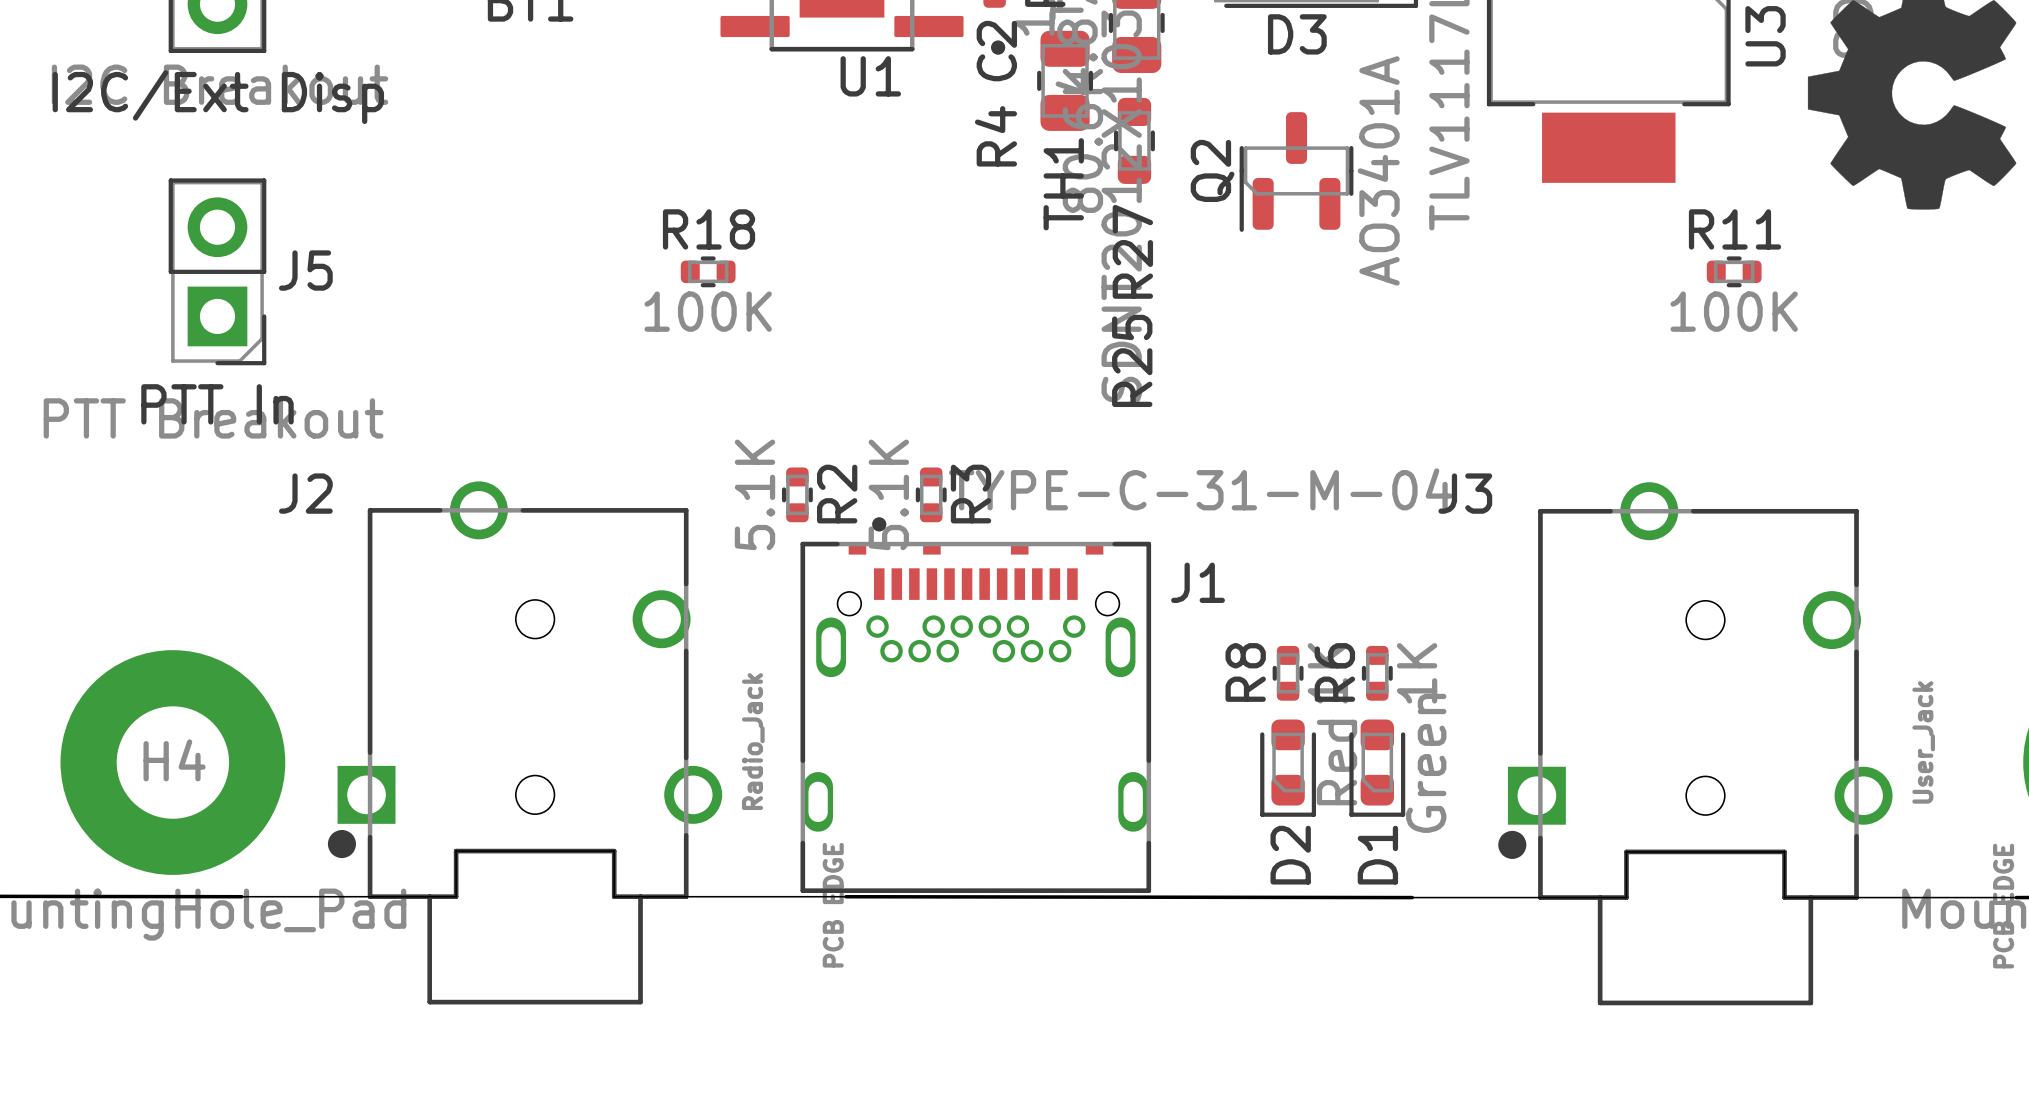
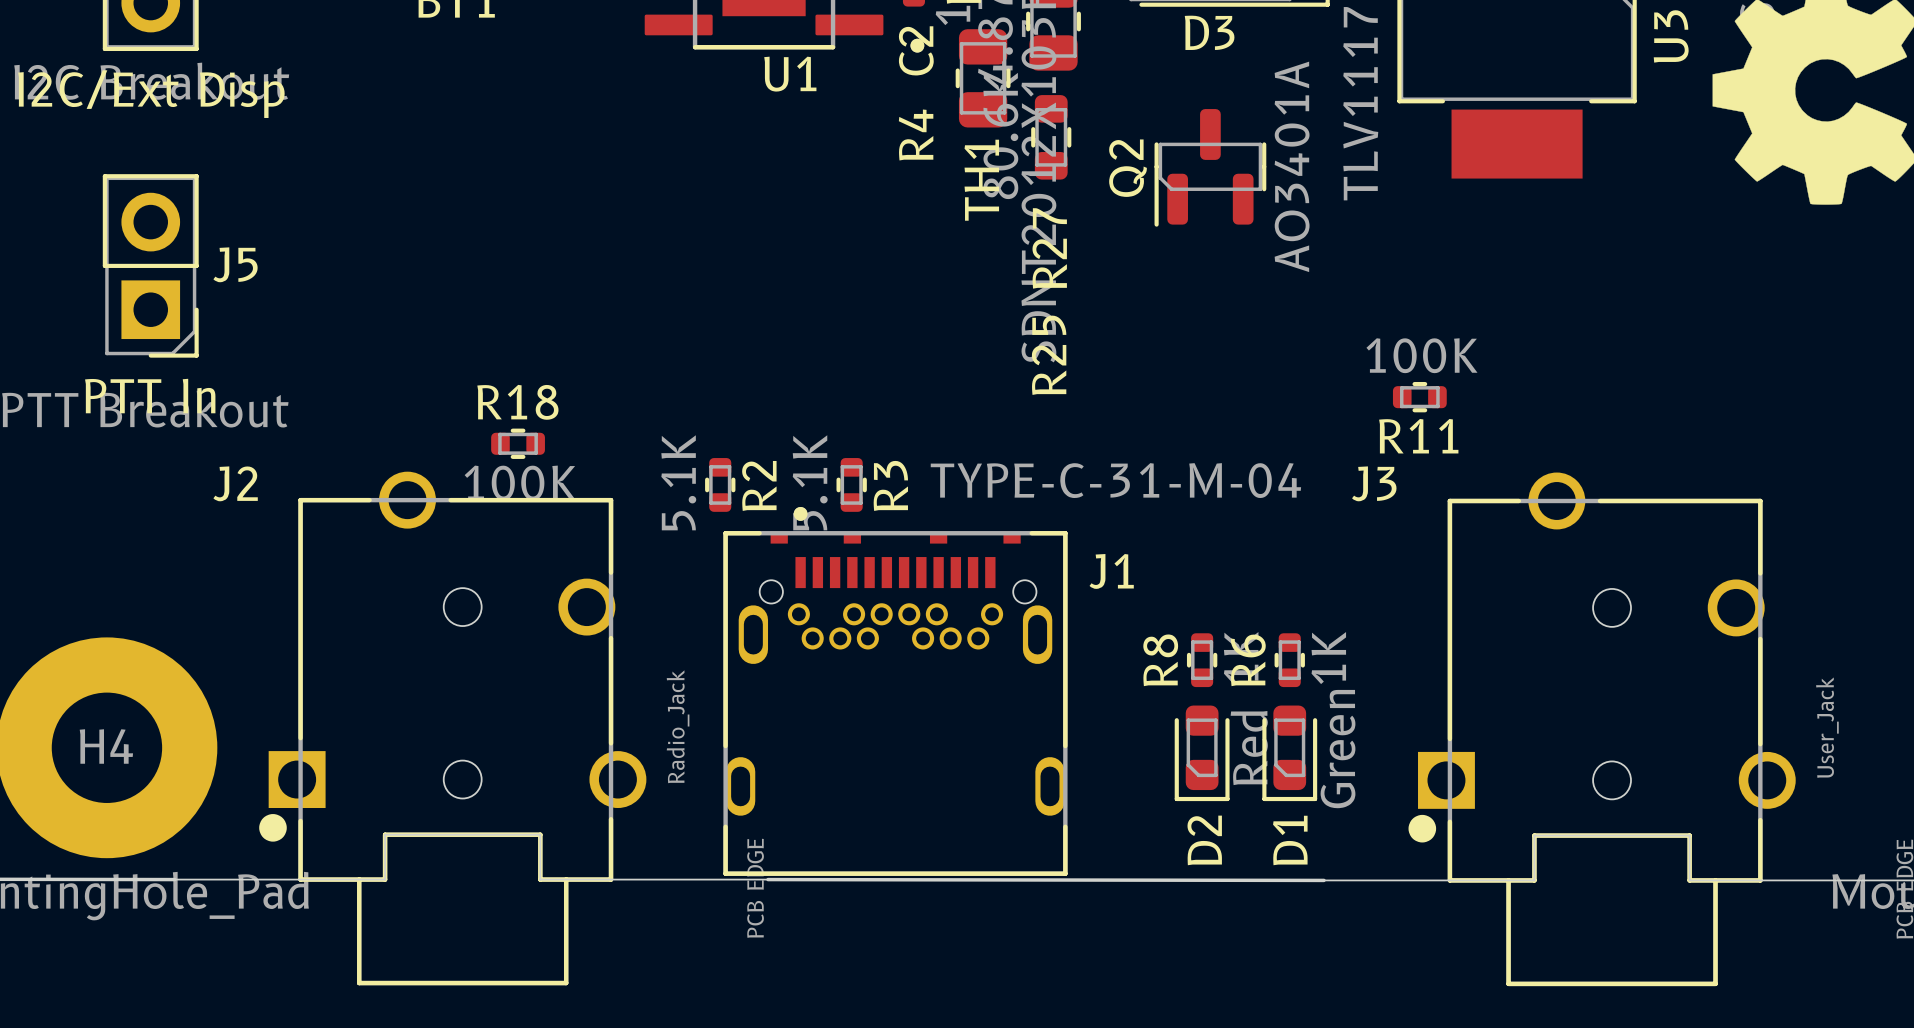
R11 name position: R11 (1735, 229) -> R11 (1418, 436)
R18 position: (708, 271) -> (518, 443)
R11 position: (1734, 271) -> (1419, 397)
R11 value position: 100K (1734, 311) -> 100K (1421, 355)

